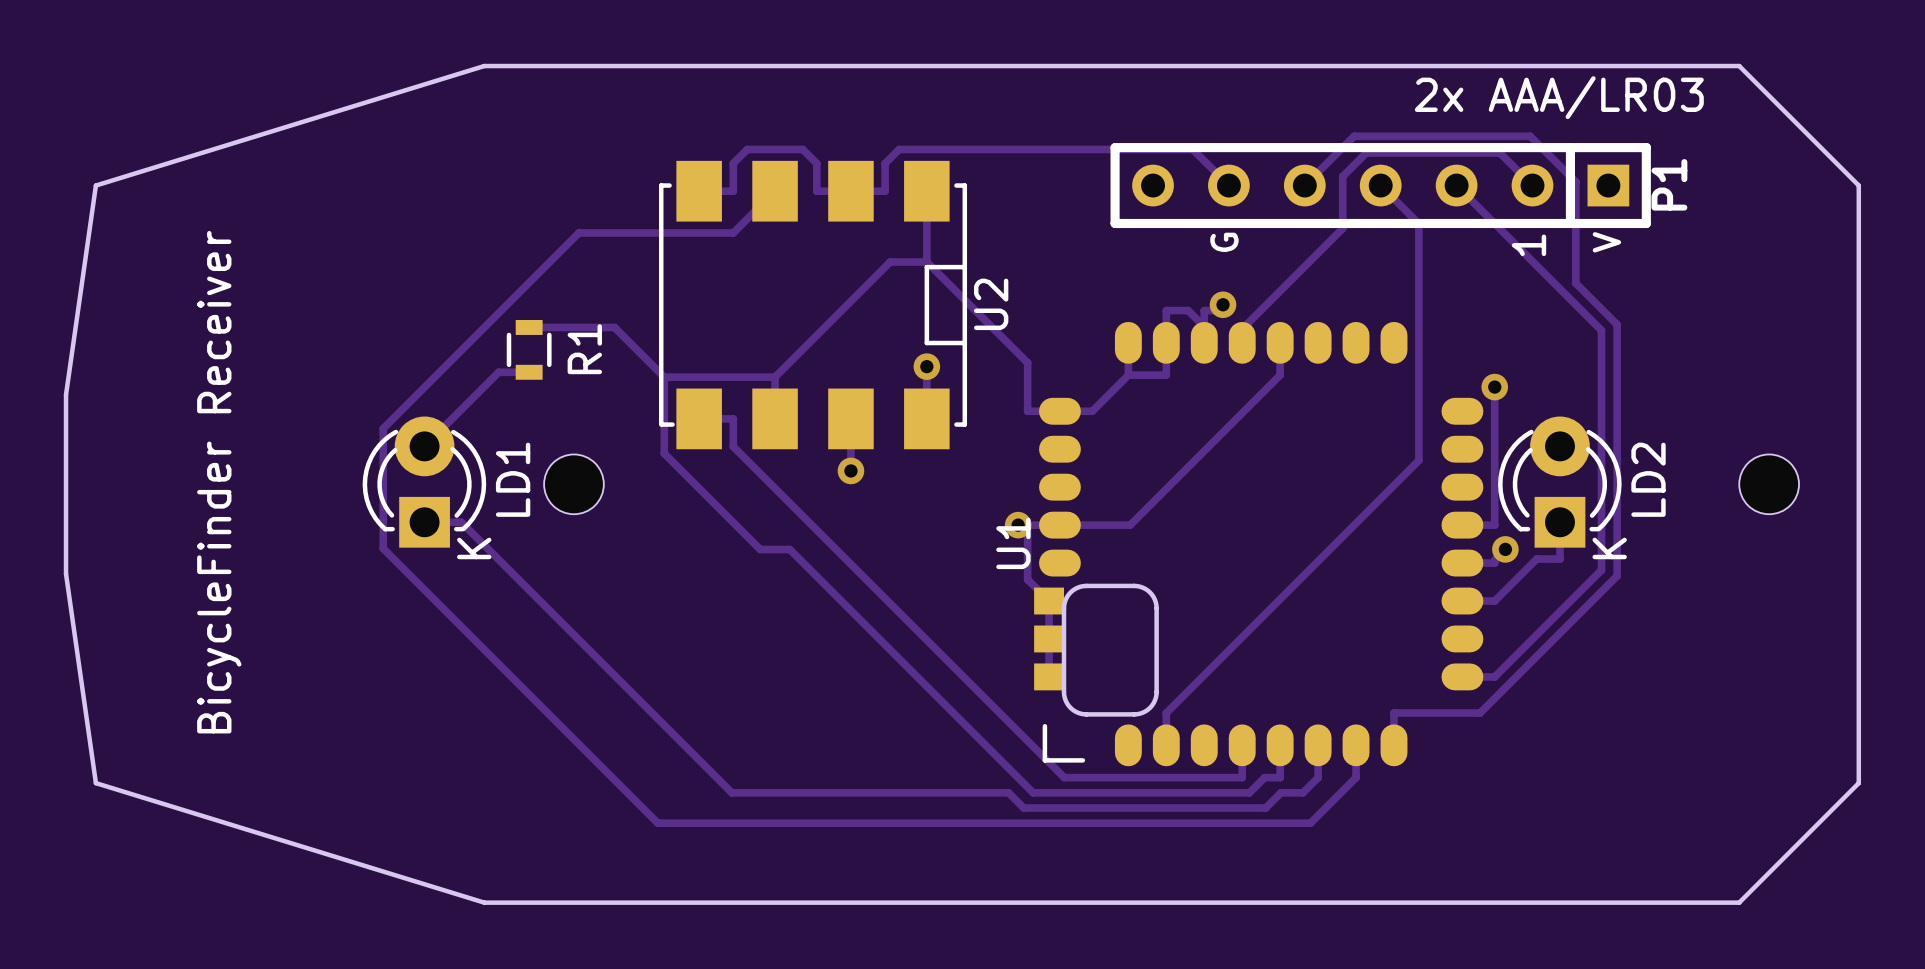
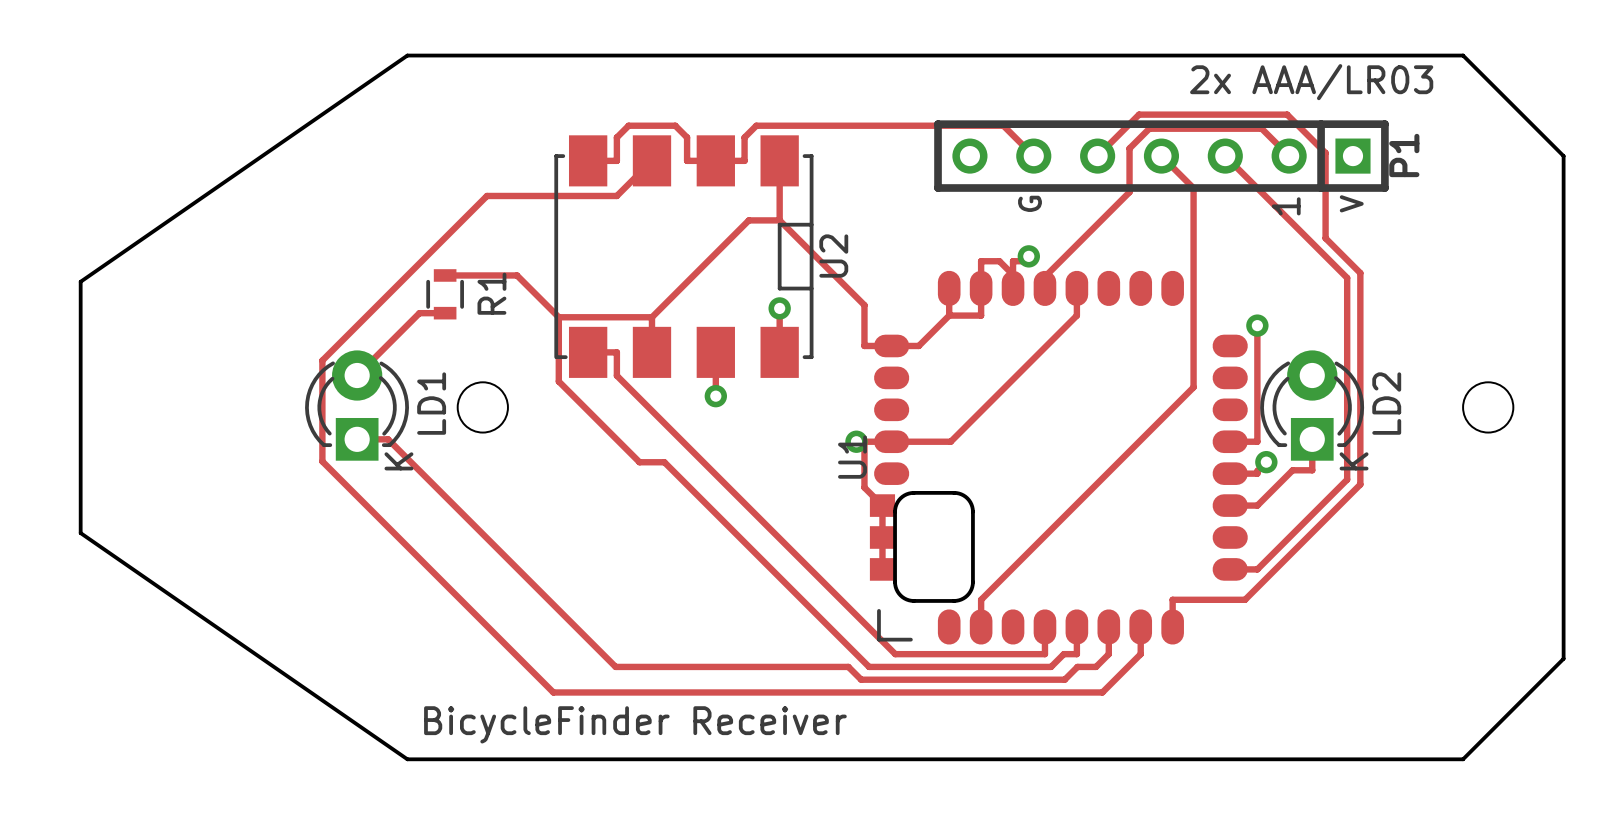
part footprint: [63, 63, 1862, 905] -> [78, 53, 1566, 762]
text rotation: 0° (219, 482) -> 90° clockwise (635, 724)
text position: BicycleFinder Receiver (219, 482) -> BicycleFinder Receiver (635, 724)

